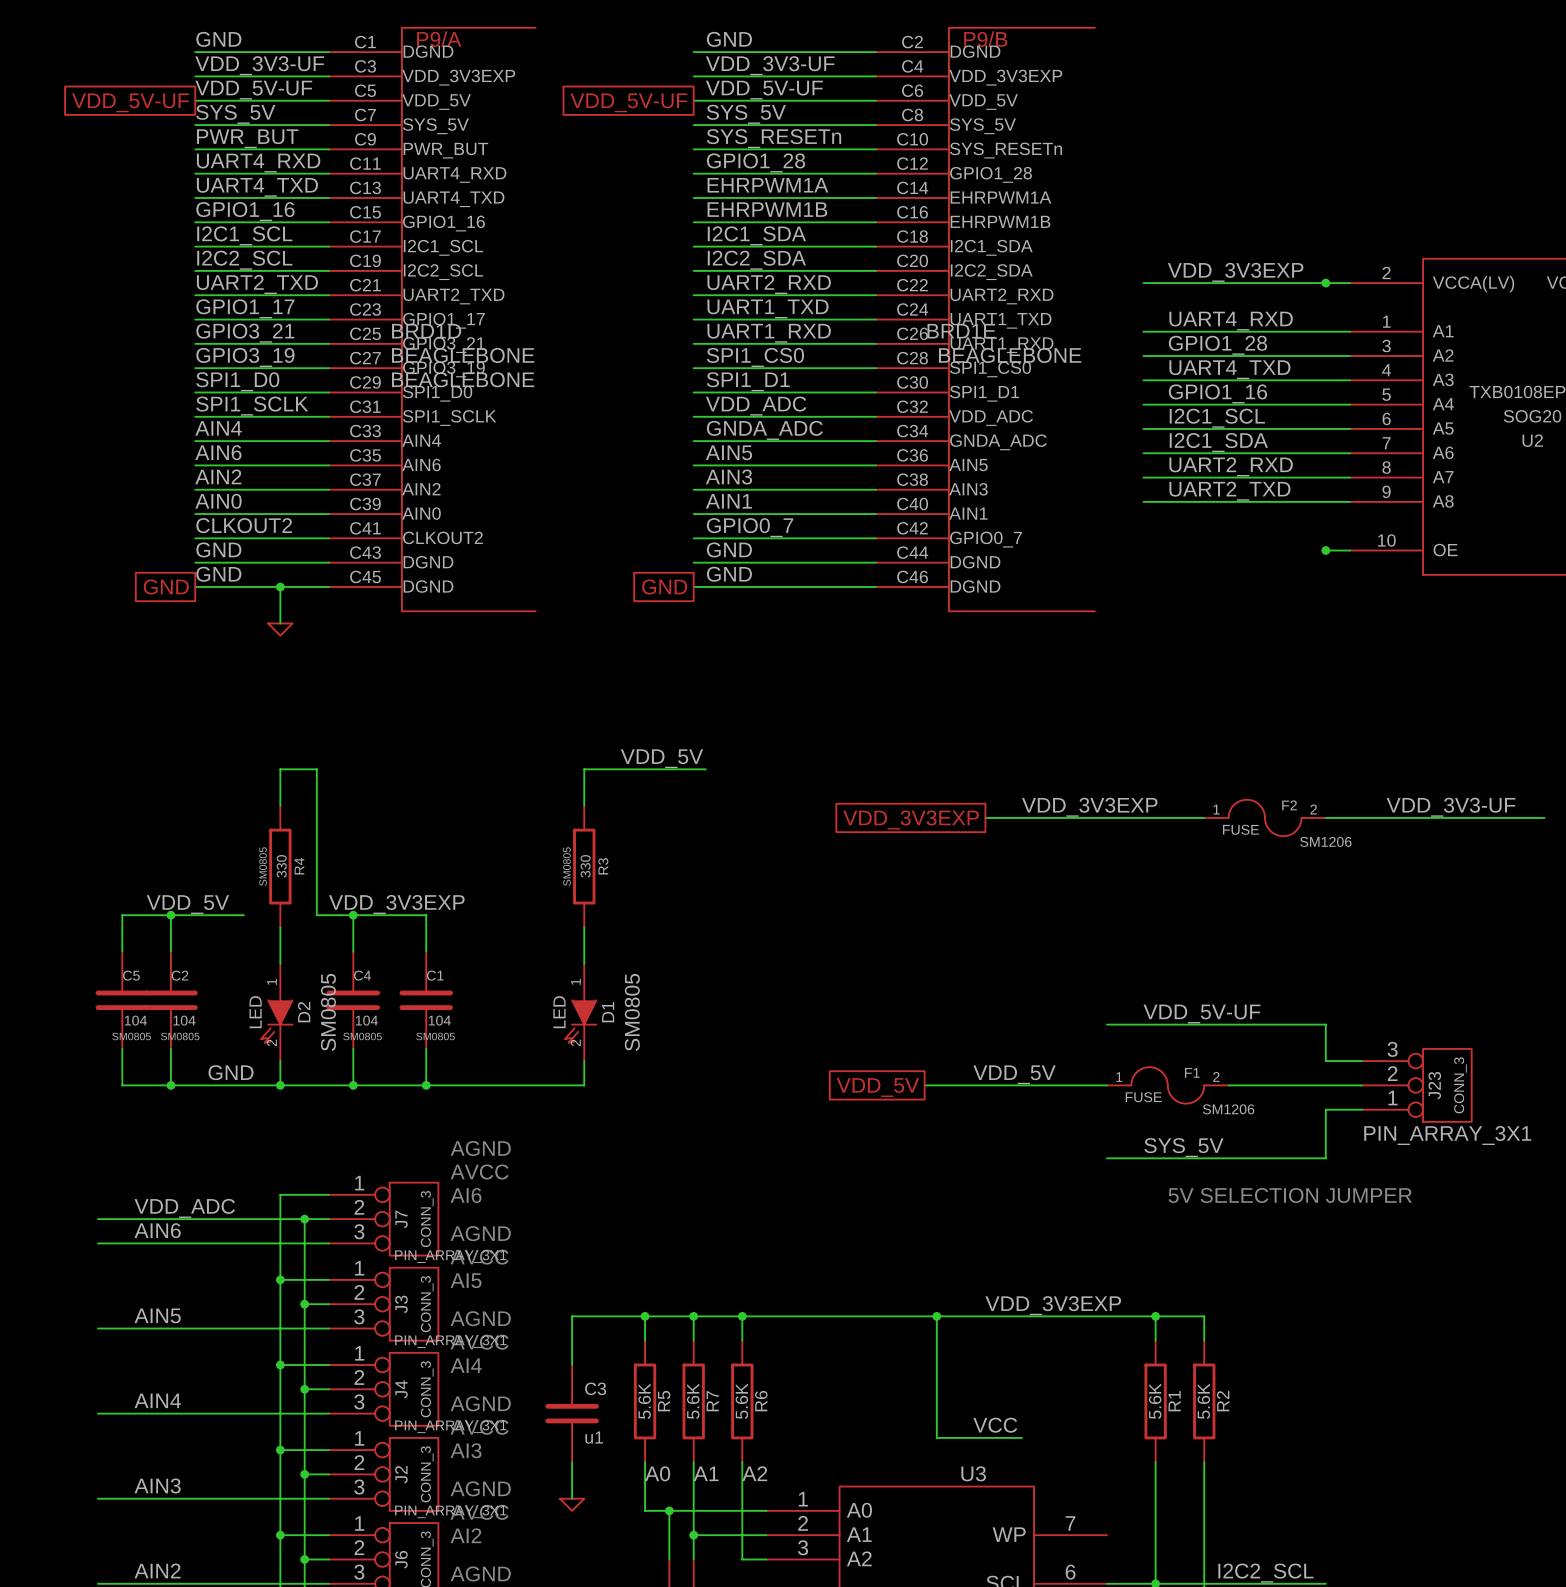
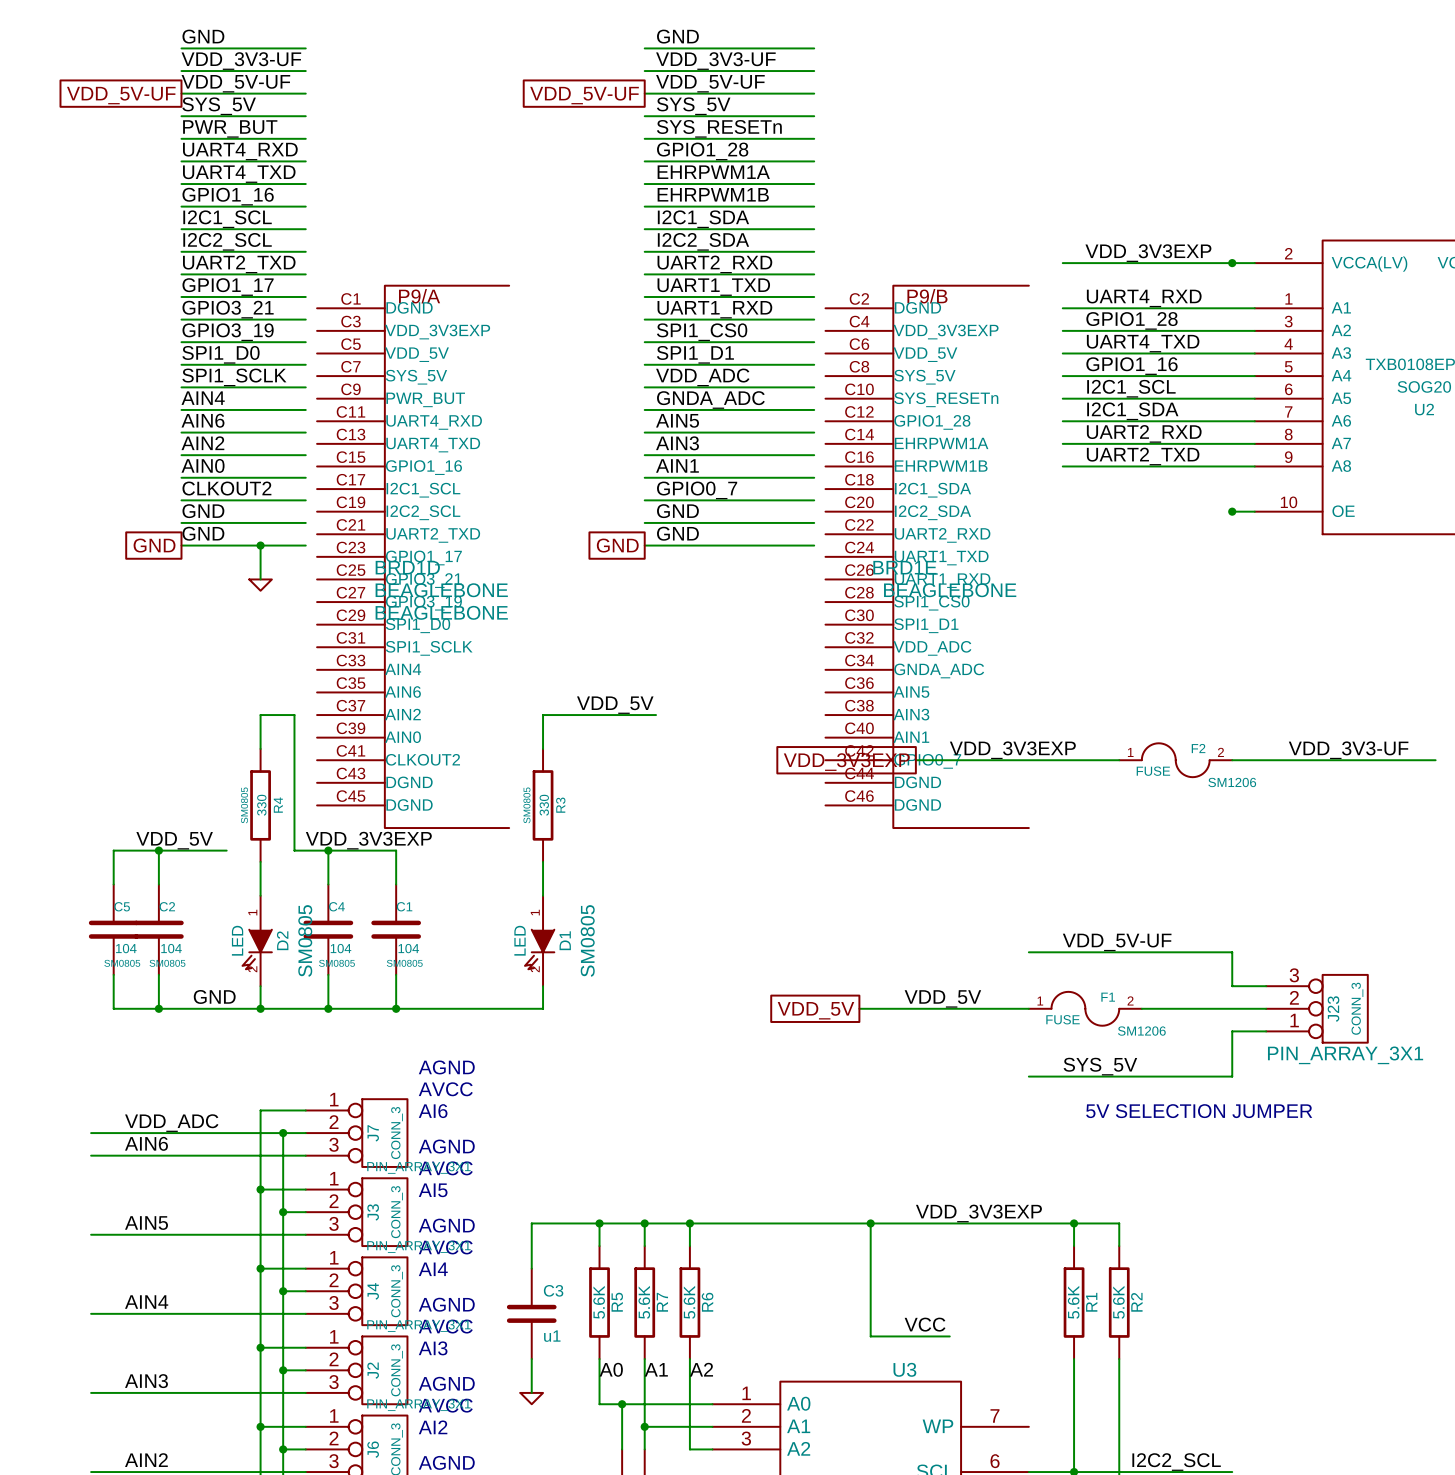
BRD1D position: (432, 319) -> (413, 556)
BRD1E position: (985, 319) -> (927, 556)

